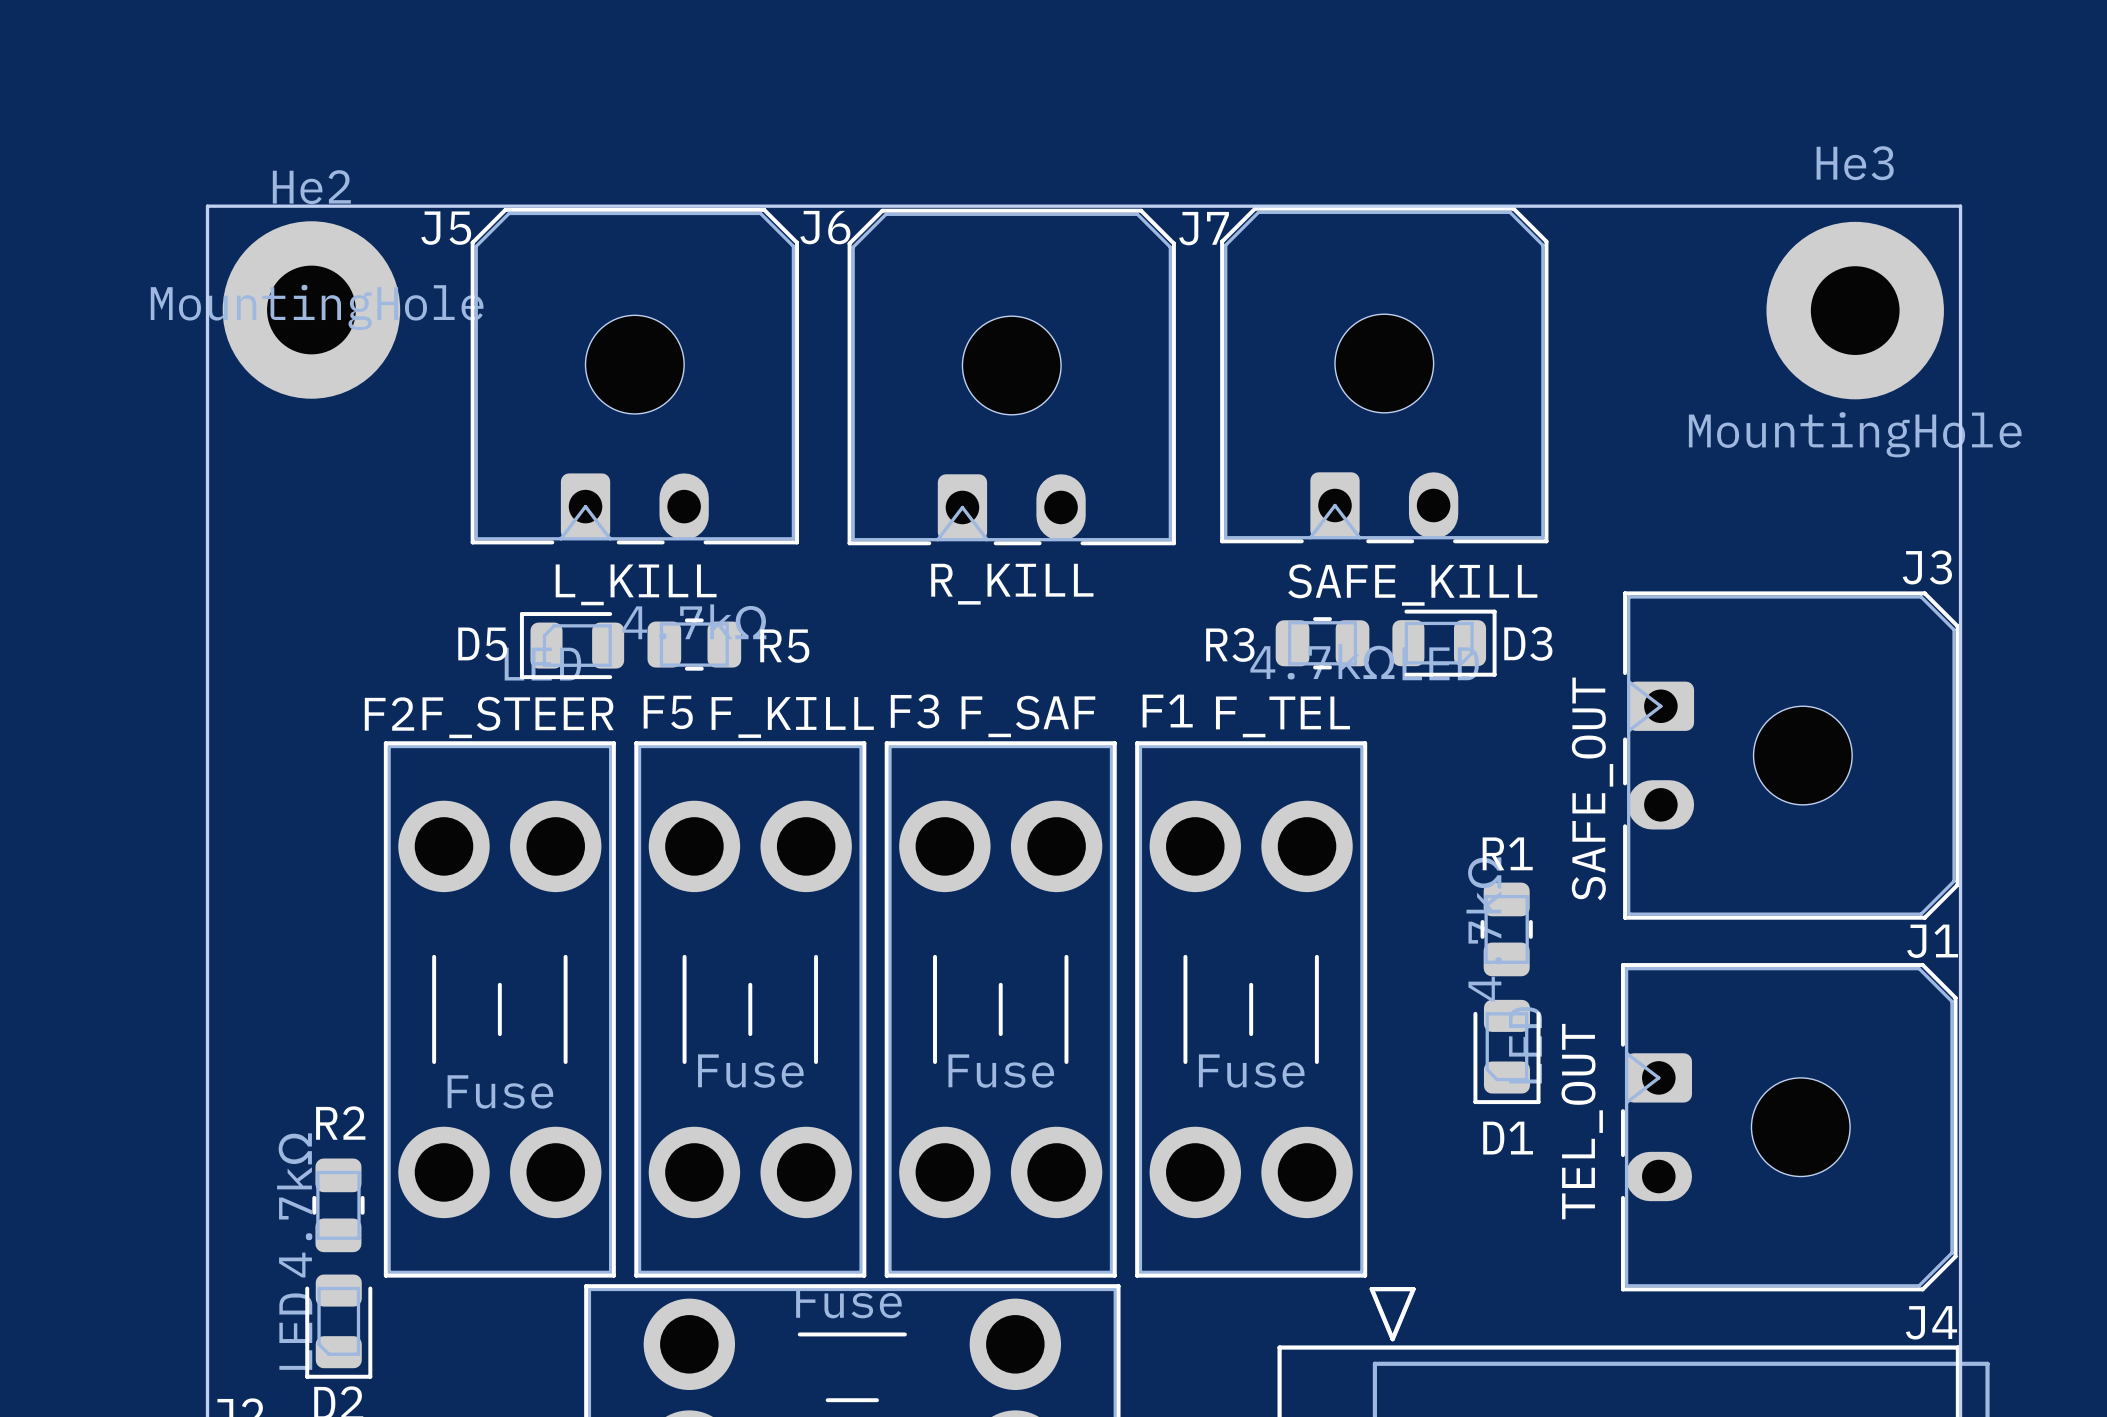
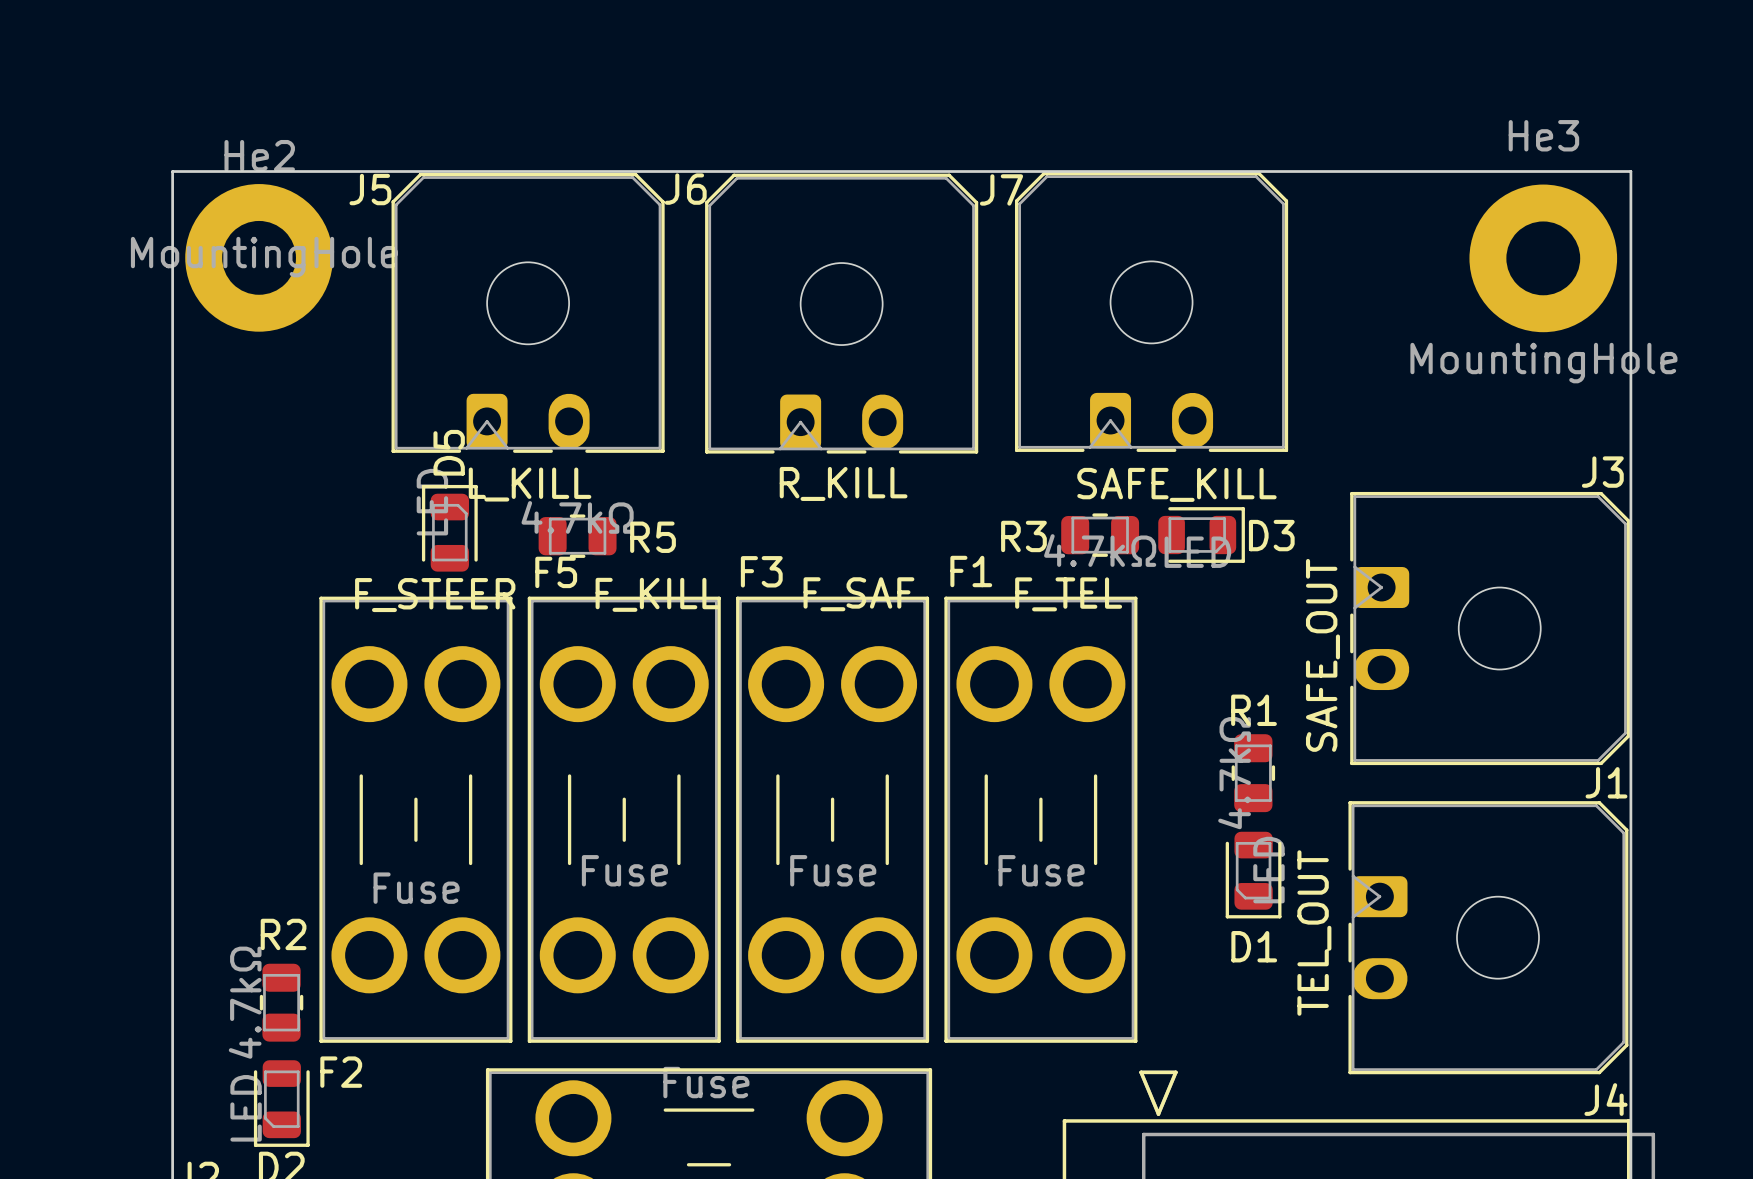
D5 rotation: 0° (572, 645) -> 90° clockwise (449, 528)
F2 name position: F2 (389, 713) -> F2 (341, 1072)
F2 position: (499, 1009) -> (415, 819)
F5 position: (750, 1009) -> (624, 819)
F3 position: (1000, 1009) -> (832, 819)
F1 position: (1251, 1009) -> (1040, 819)

